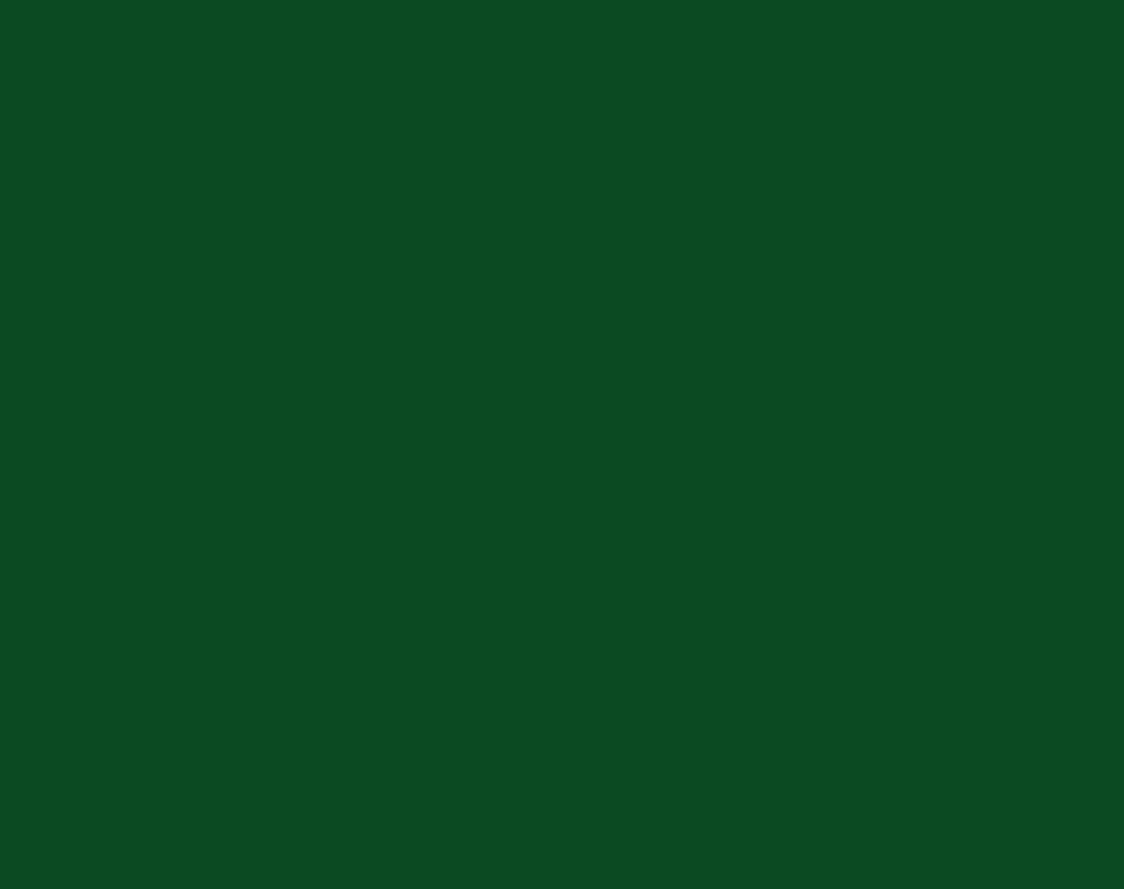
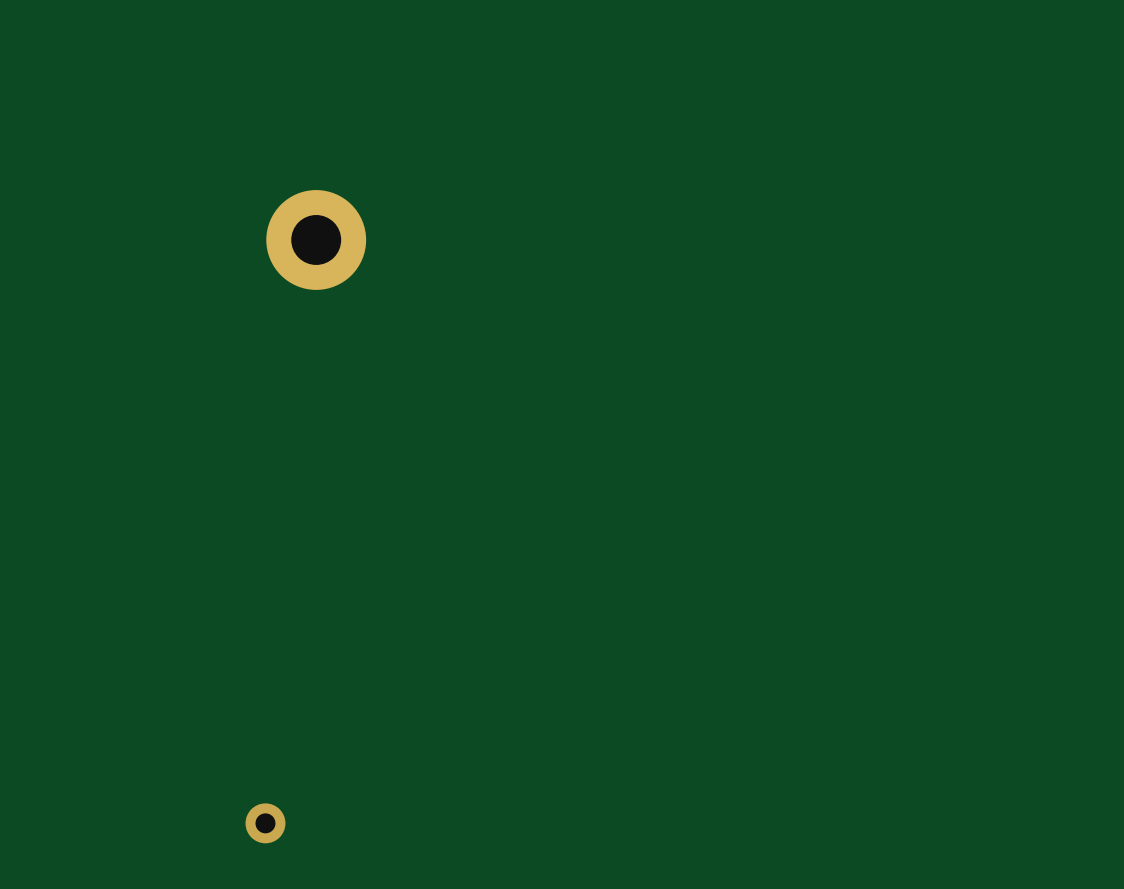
part: none -> (316, 239)
via: none -> (265, 823)

